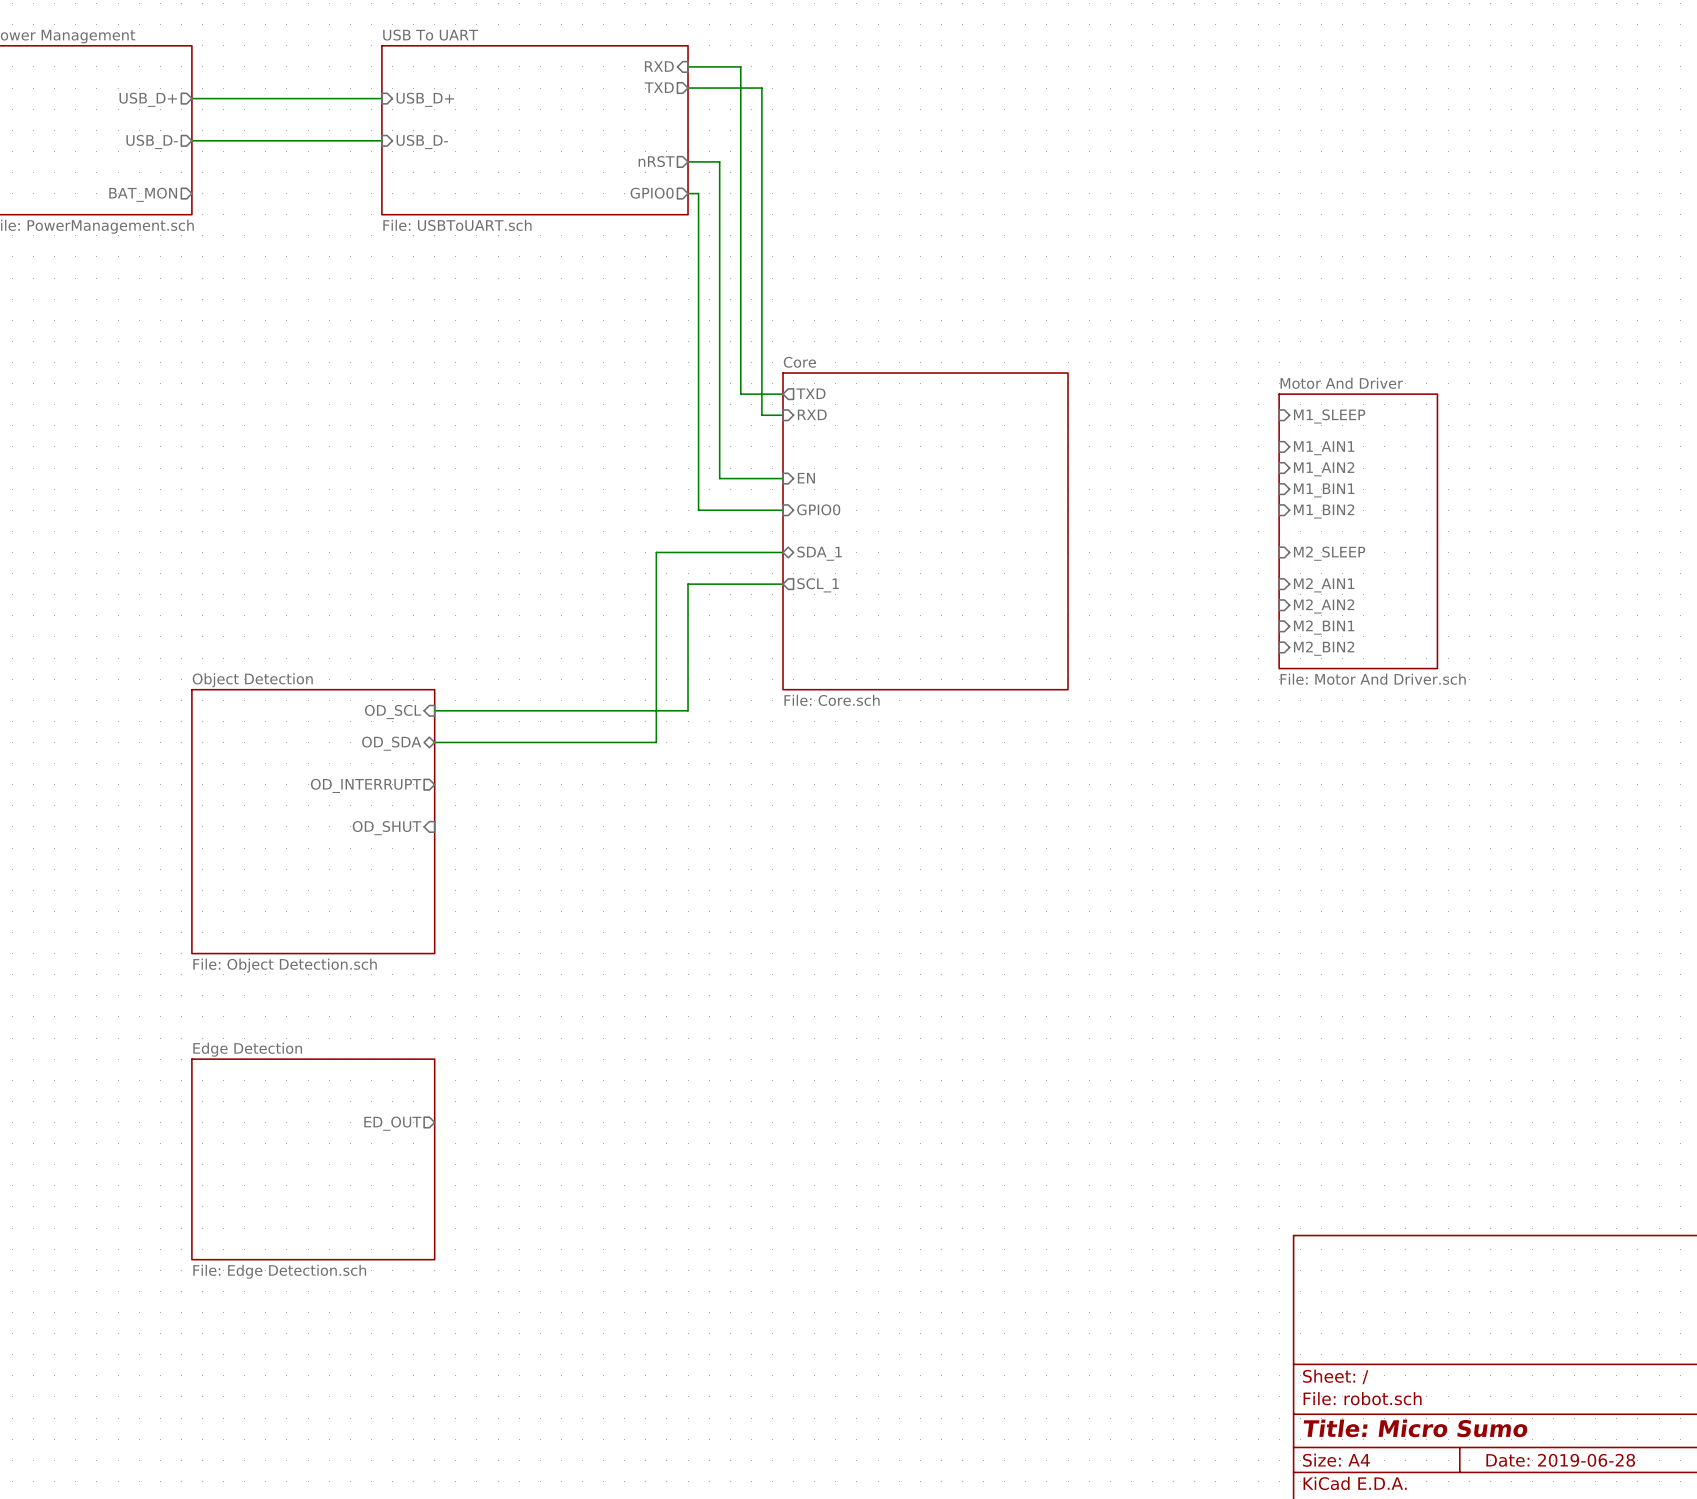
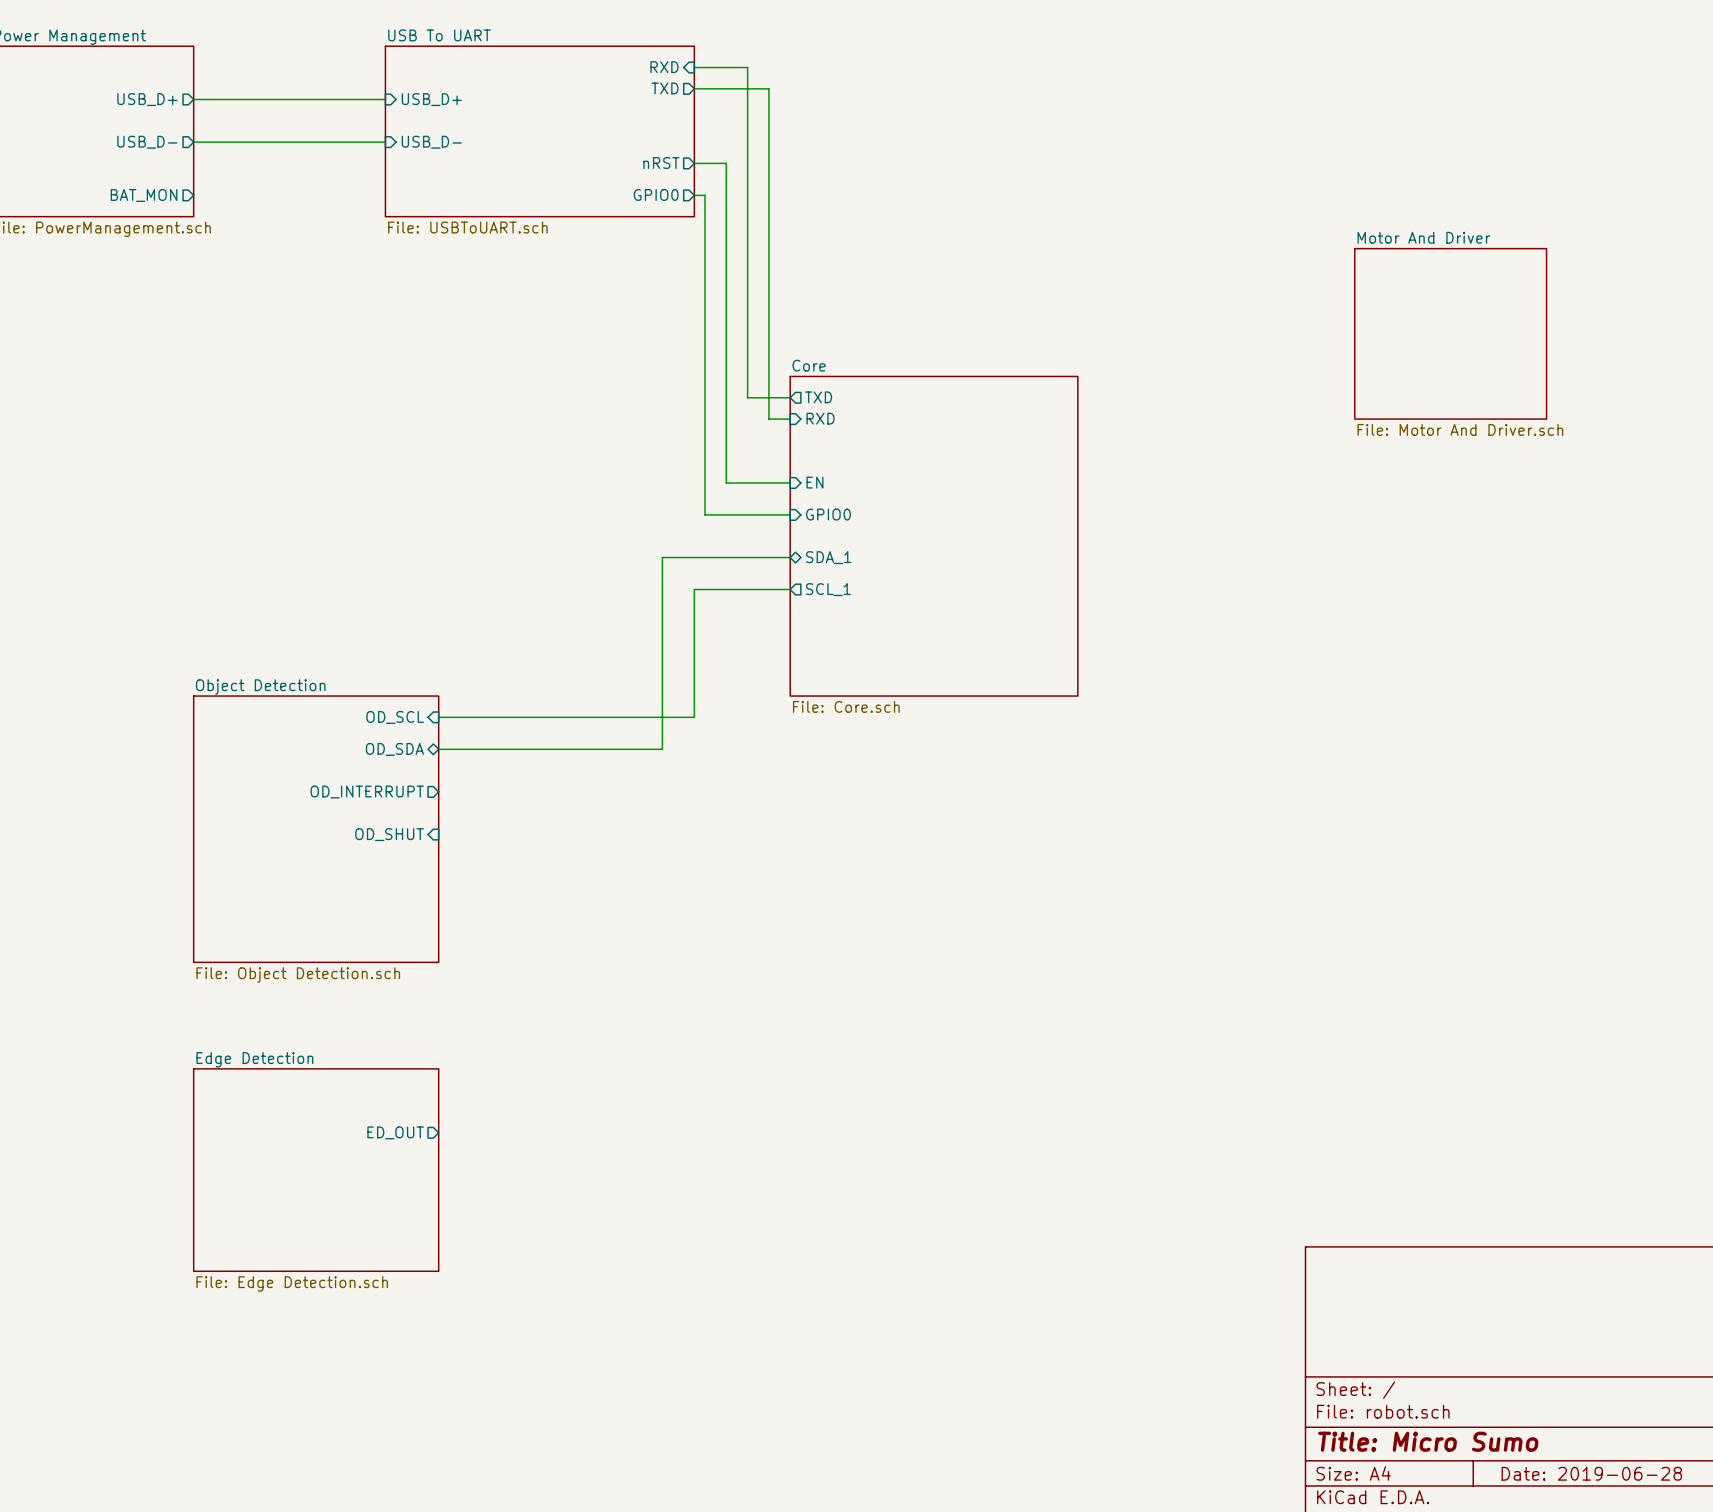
sheet Motor And Driver: none -> File: Motor And Driver.sch (1450, 333)
sheet pin: M1_SLEEP (1329, 416) -> none
sheet pin: M1_AIN1 (1324, 448) -> none
sheet pin: M1_AIN2 (1324, 469) -> none
sheet pin: M1_BIN1 (1324, 490) -> none
sheet pin: M1_BIN2 (1324, 511) -> none
sheet Motor And Driver: File: Motor And Driver.sch (1358, 531) -> none
sheet pin: M2_SLEEP (1329, 553) -> none
sheet pin: M2_AIN1 (1324, 585) -> none
sheet pin: M2_AIN2 (1324, 606) -> none
sheet pin: M2_BIN1 (1324, 627) -> none
sheet pin: M2_BIN2 (1324, 648) -> none

